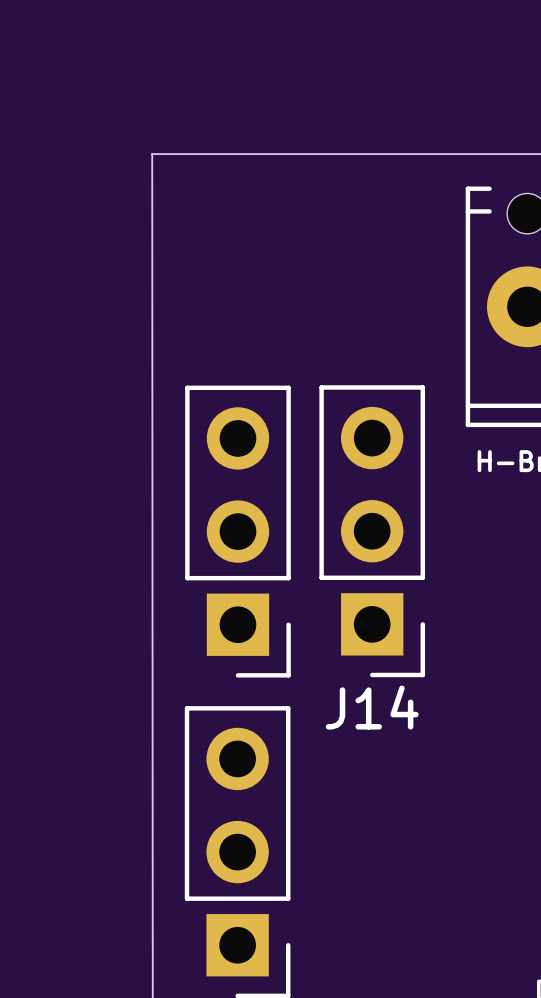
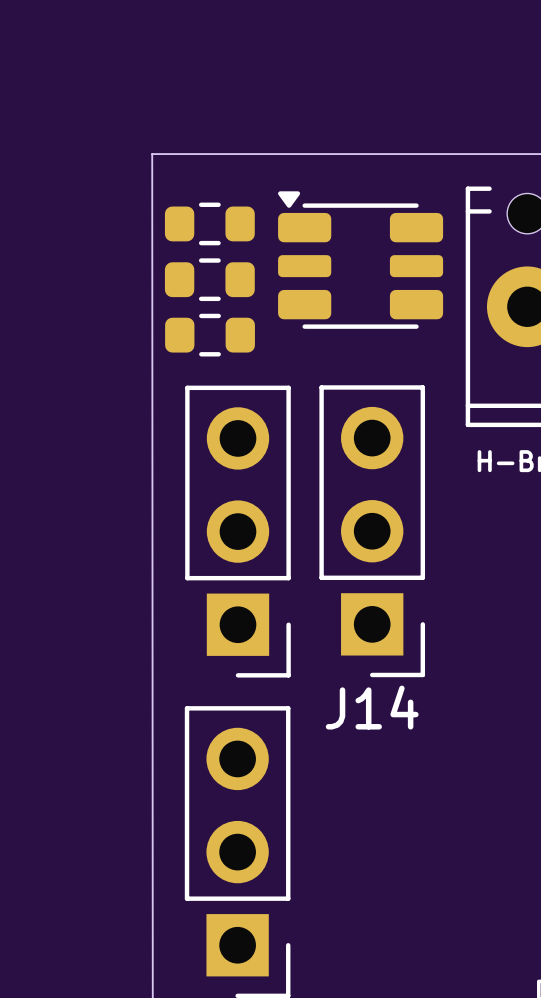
part: none -> (209, 223)
part: none -> (360, 260)
part: none -> (209, 279)
part: none -> (210, 335)

